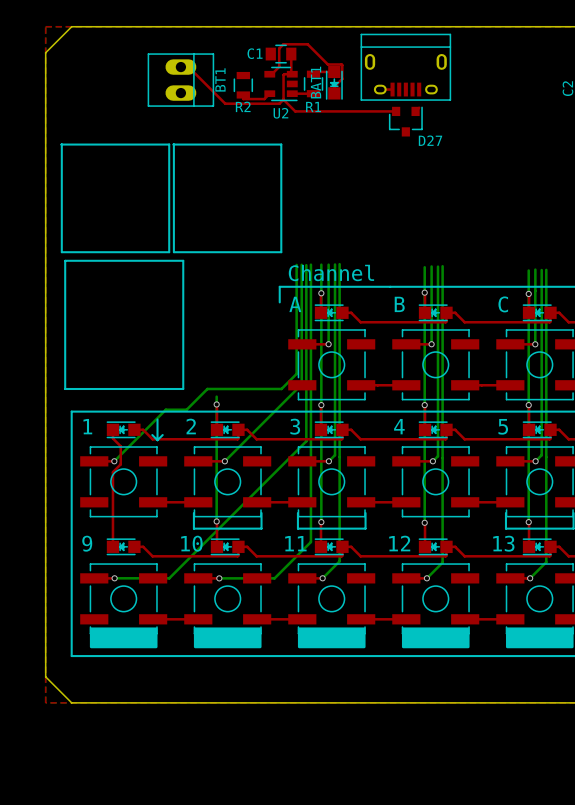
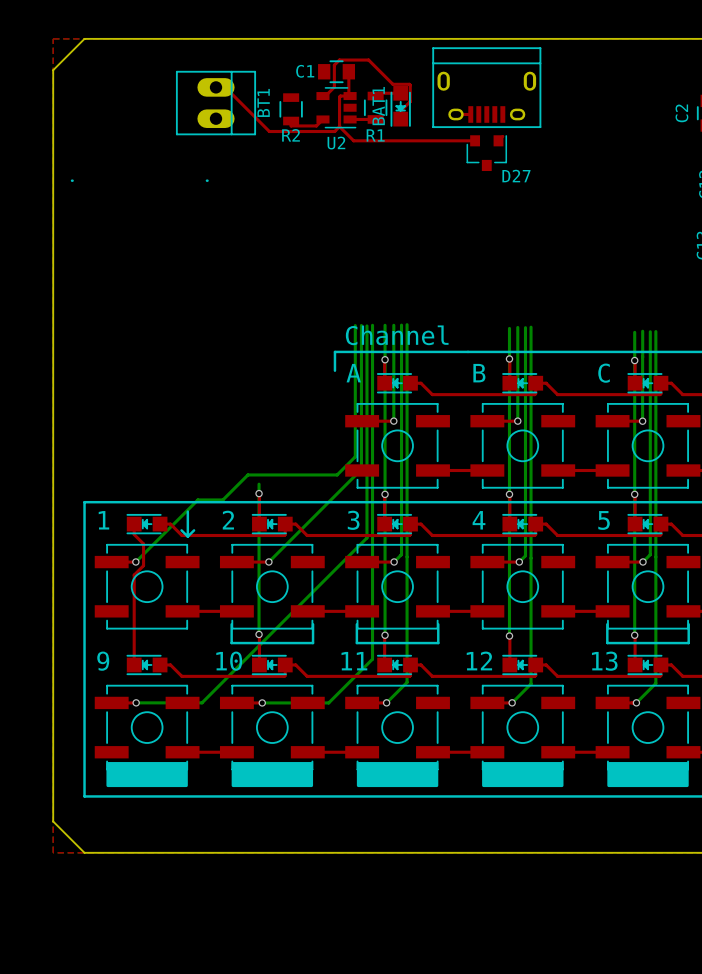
line: (61, 144) (169, 144) (169, 252) (61, 252) (61, 144) -> none
line: (173, 144) (281, 144) (281, 252) (173, 252) (173, 144) -> none
line: (65, 260) (183, 260) (183, 388) (65, 388) (65, 260) -> none

